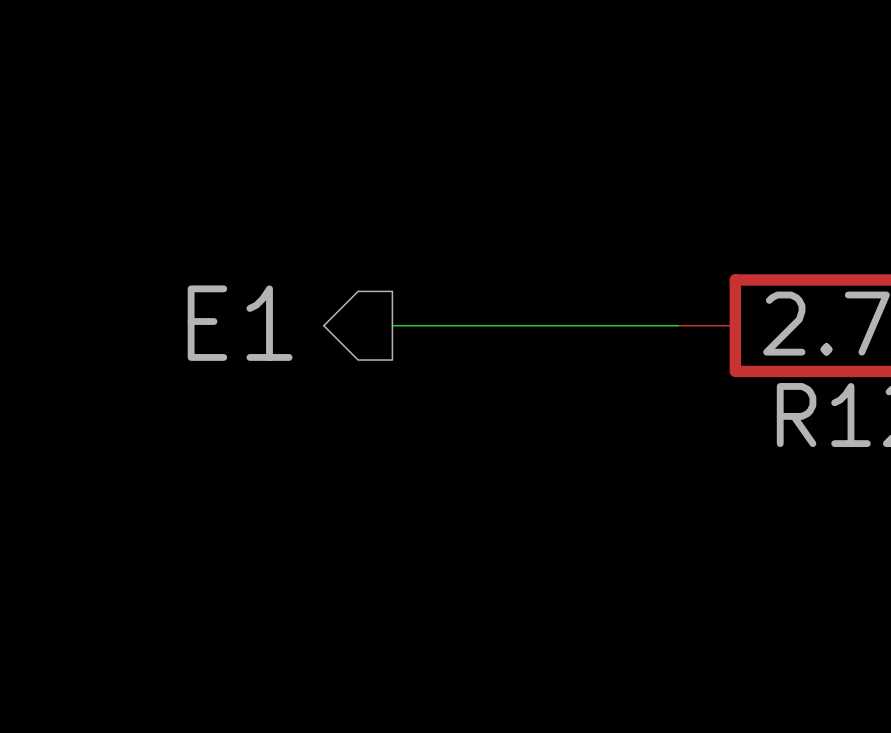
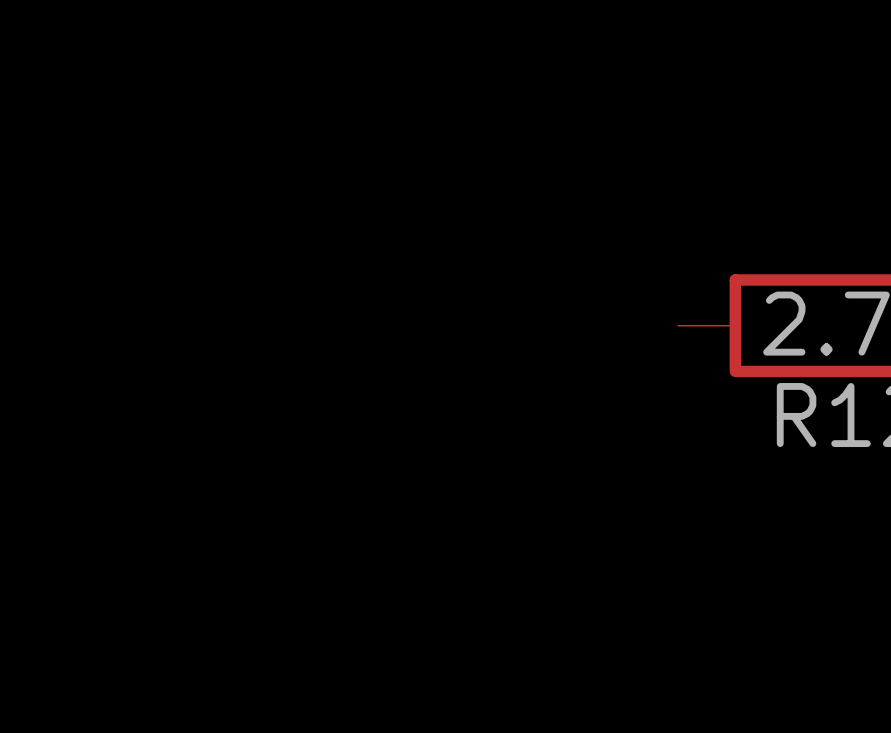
hierarchical label: E1 (240, 323) -> none
wire: (392, 325) (678, 325) -> none

